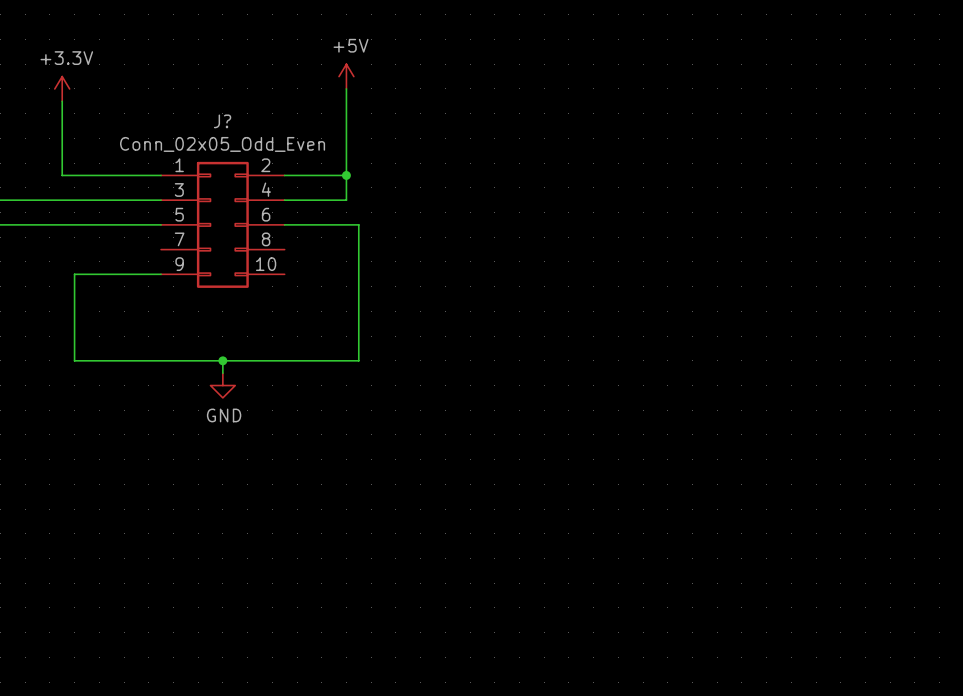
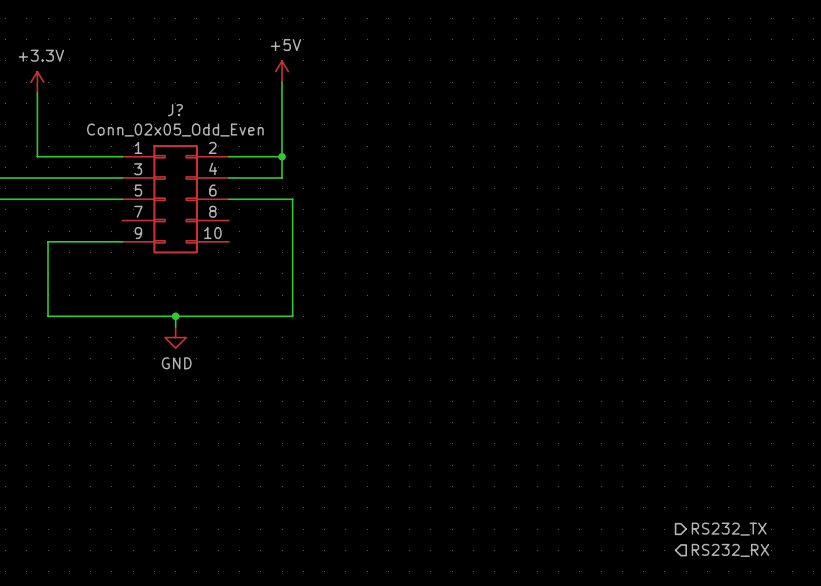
hierarchical label: none -> RS232_TX (729, 529)
hierarchical label: none -> RS232_RX (730, 550)

